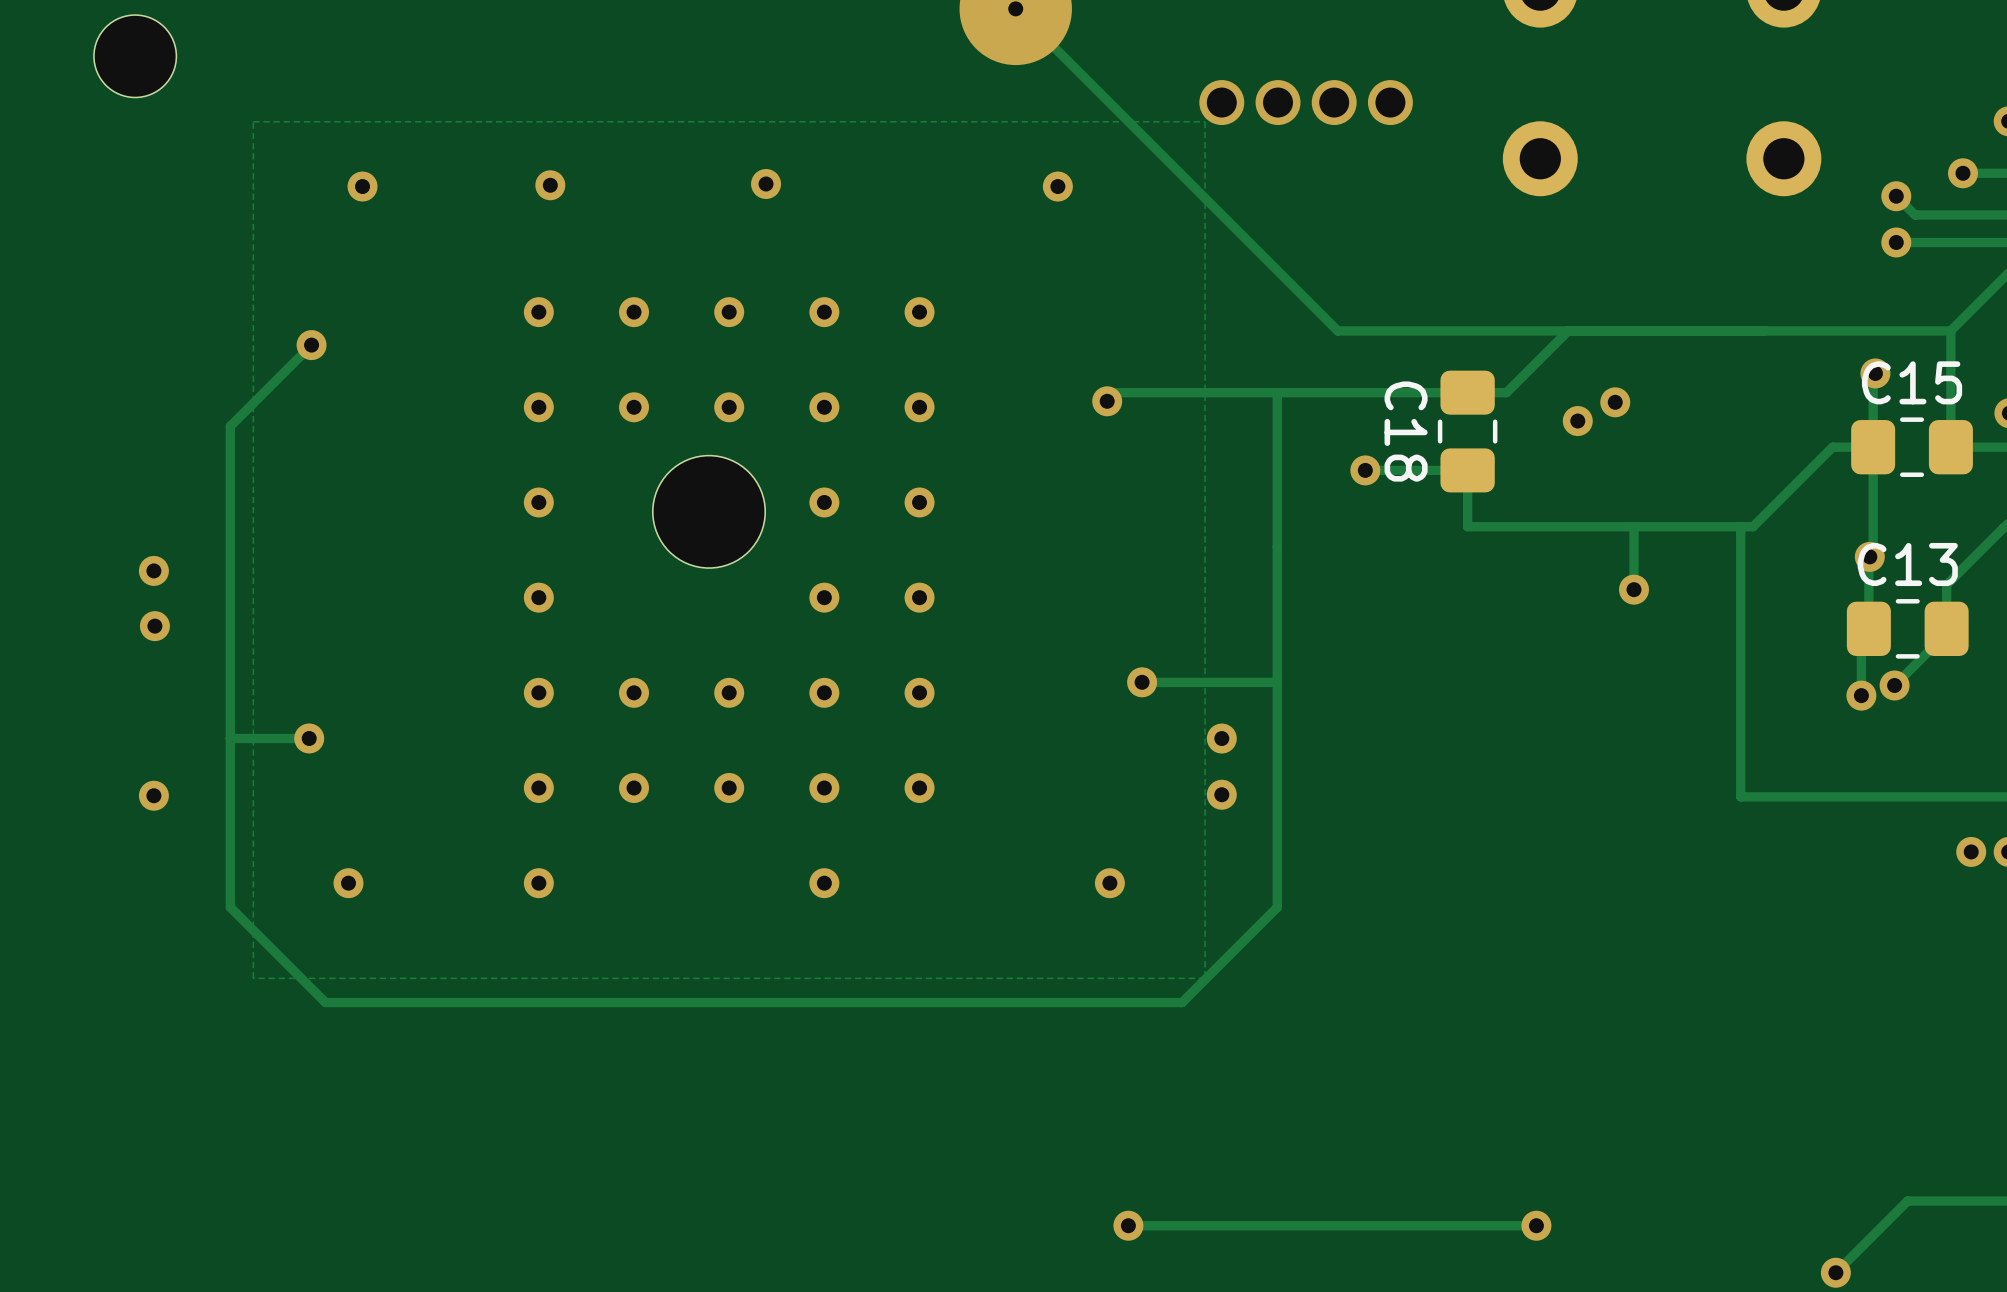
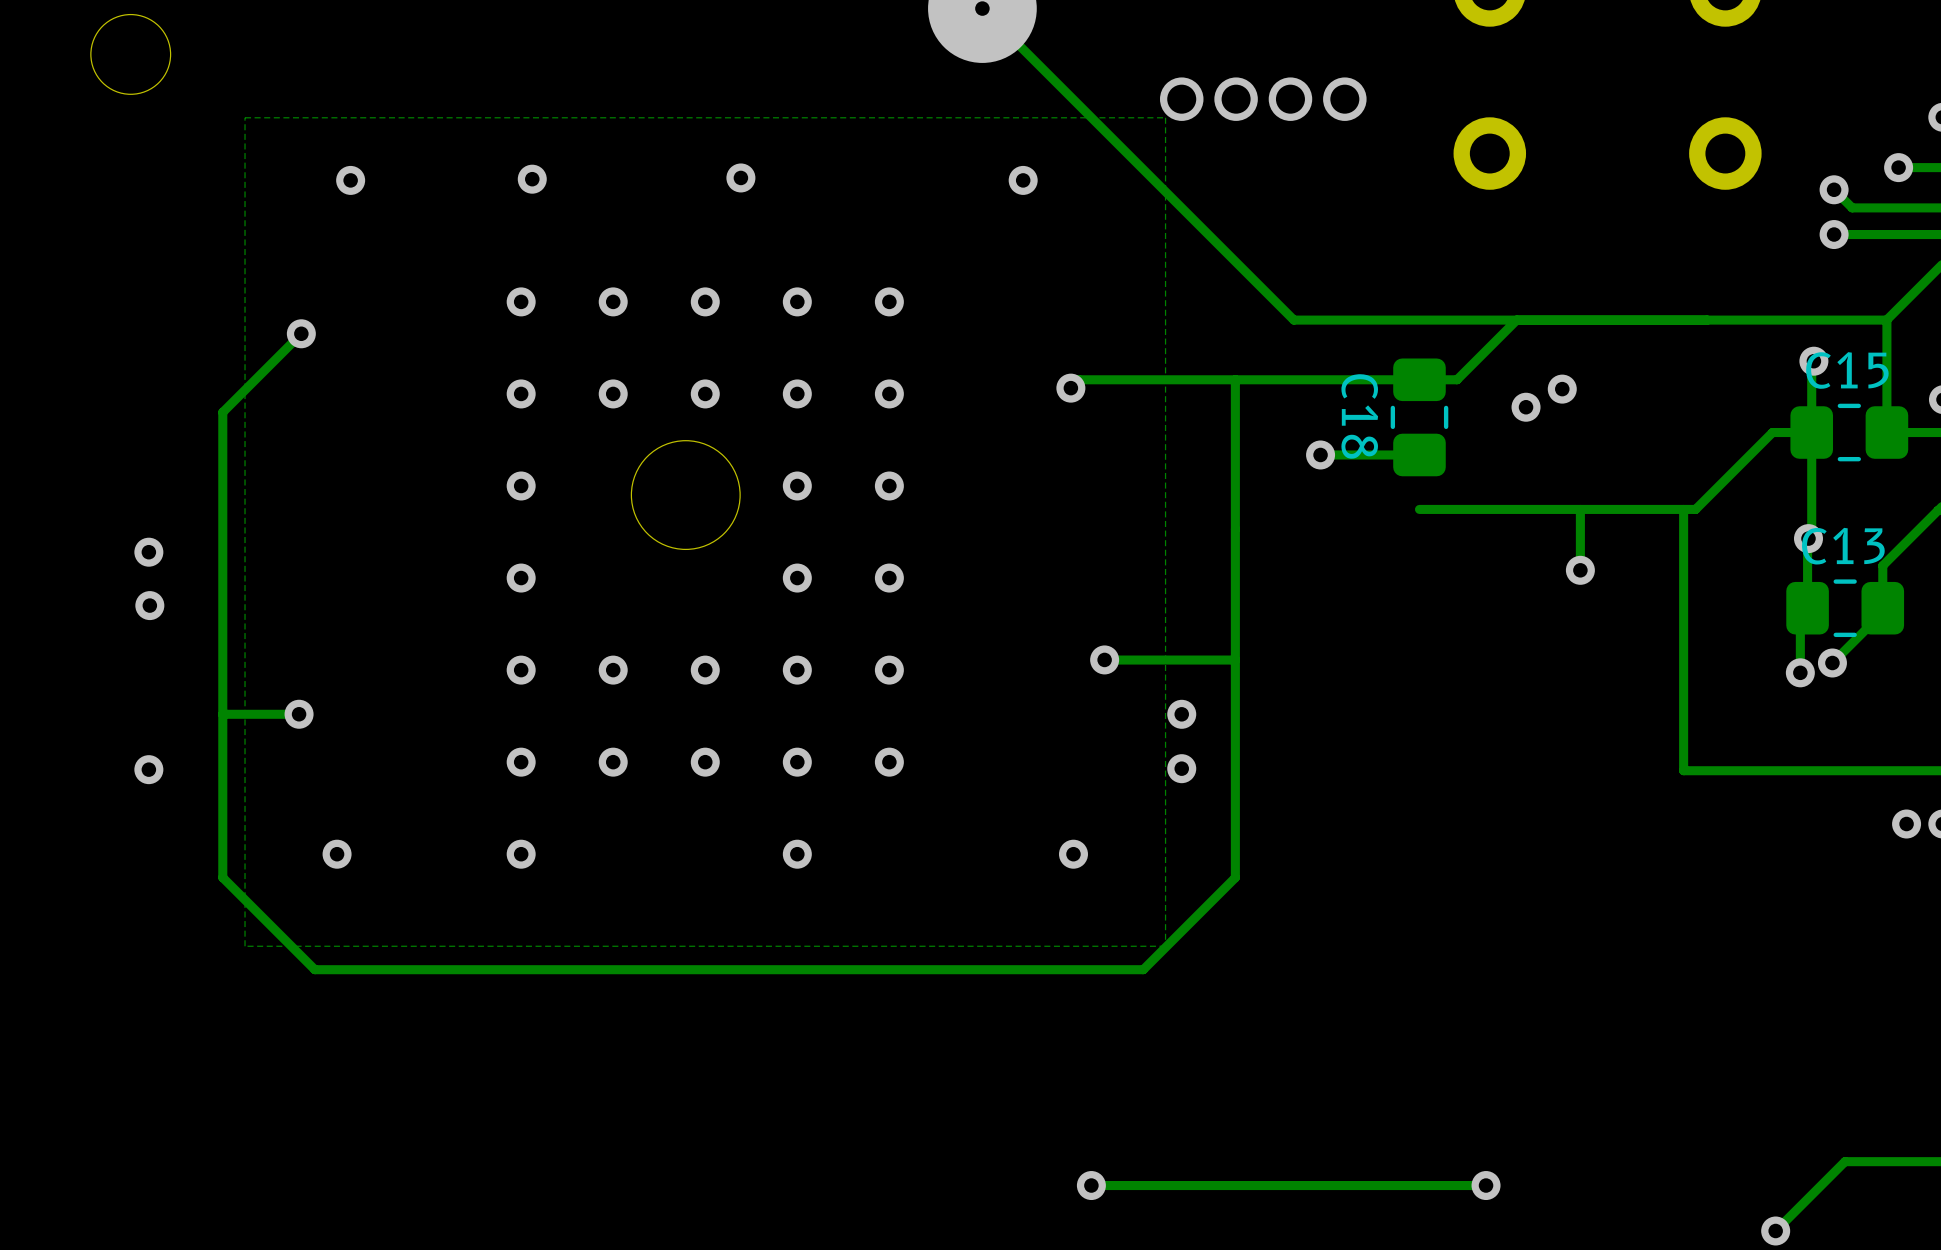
track: (1467, 470) (1467, 526) -> none

